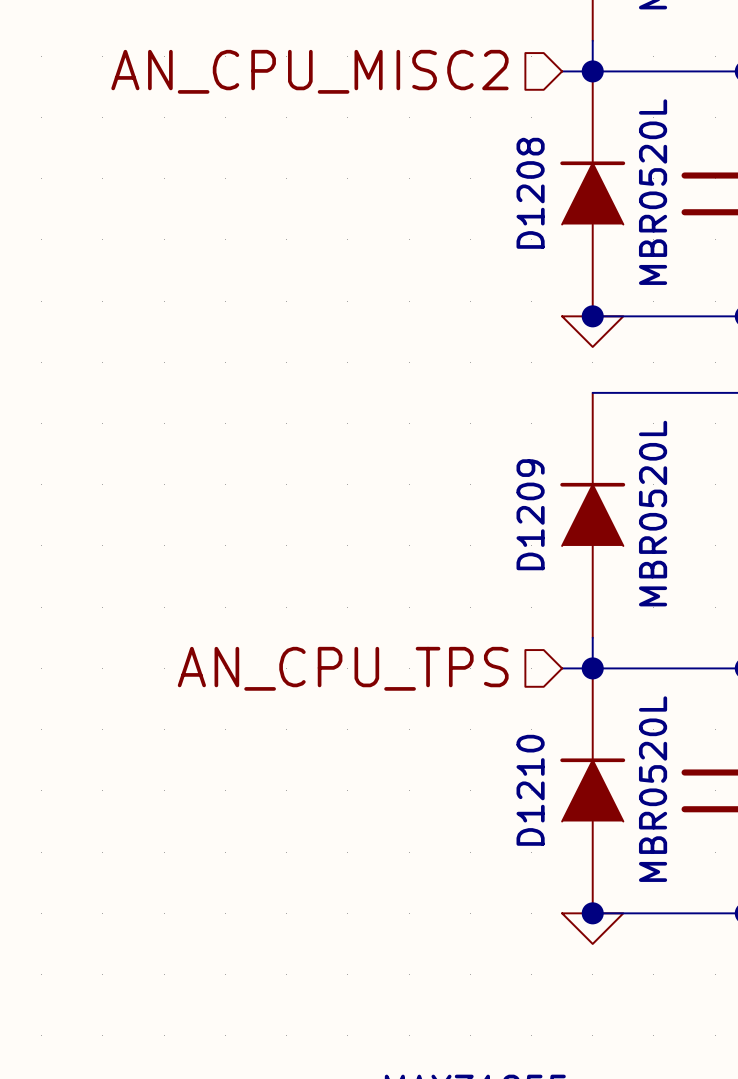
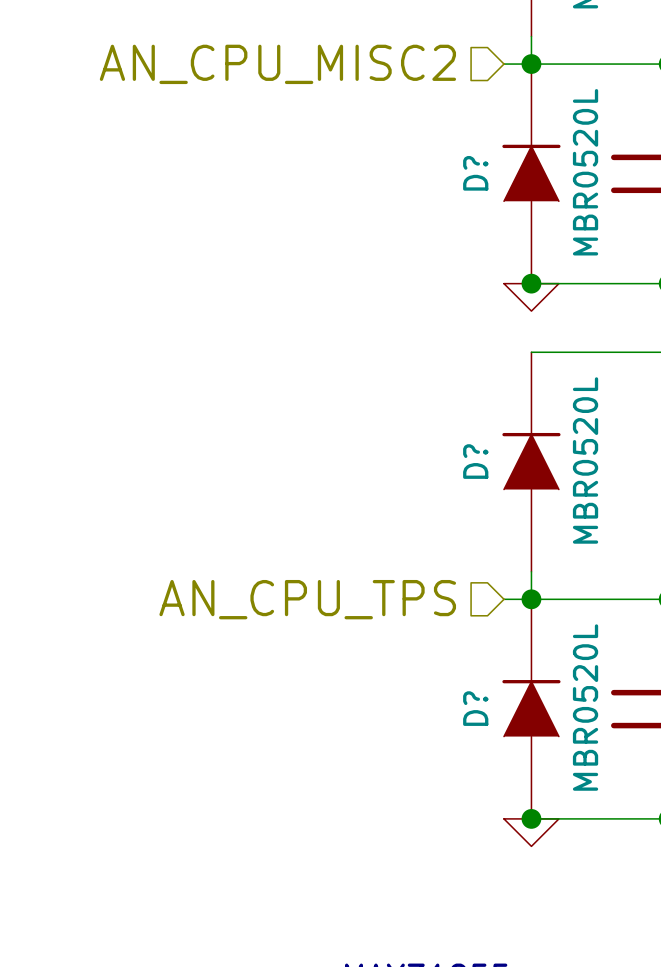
D1208 name: D1208 (530, 193) -> D? (475, 173)
D1209 name: D1209 (530, 514) -> D? (475, 461)
D1210 name: D1210 (530, 790) -> D? (475, 708)

